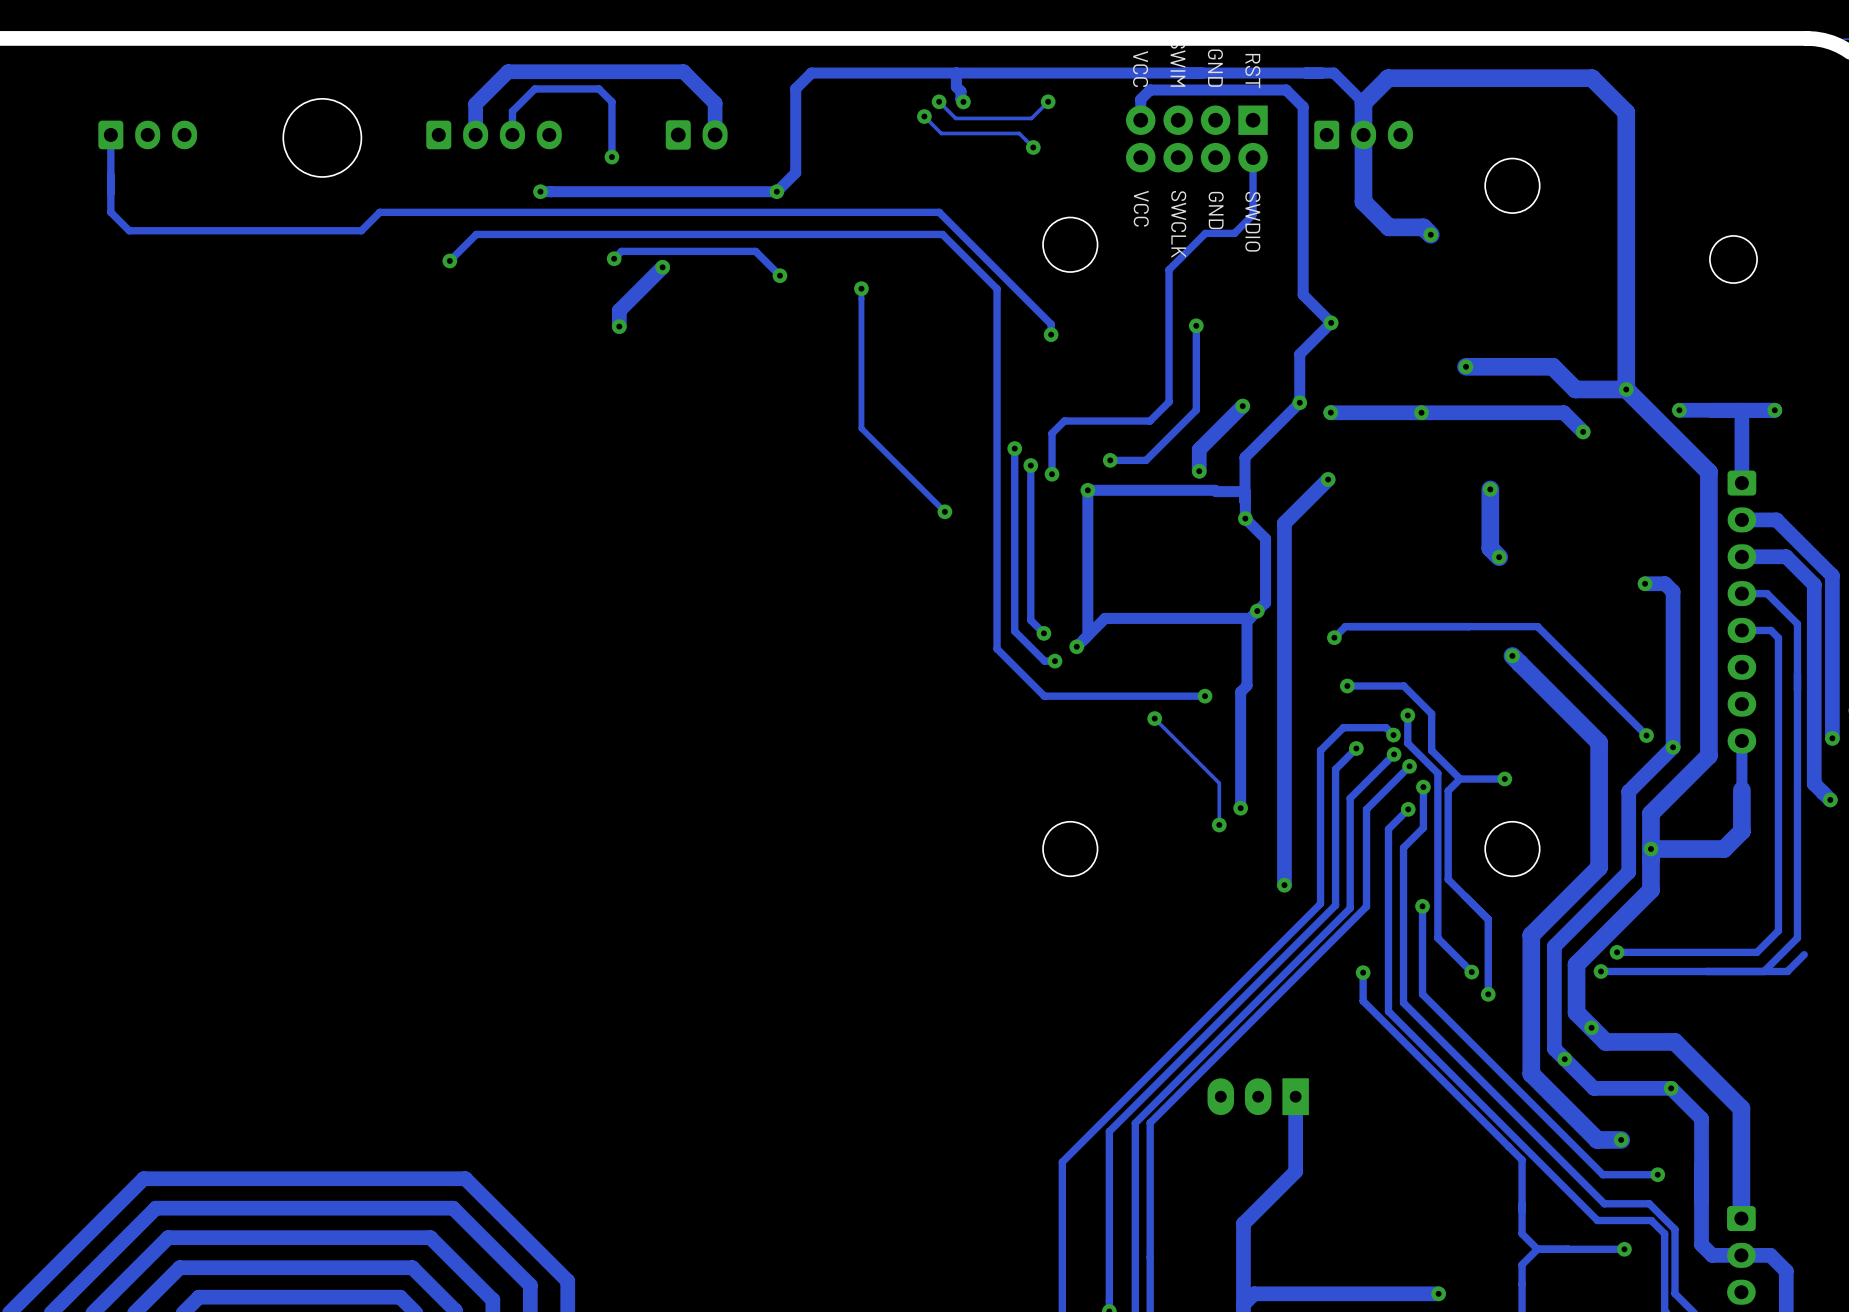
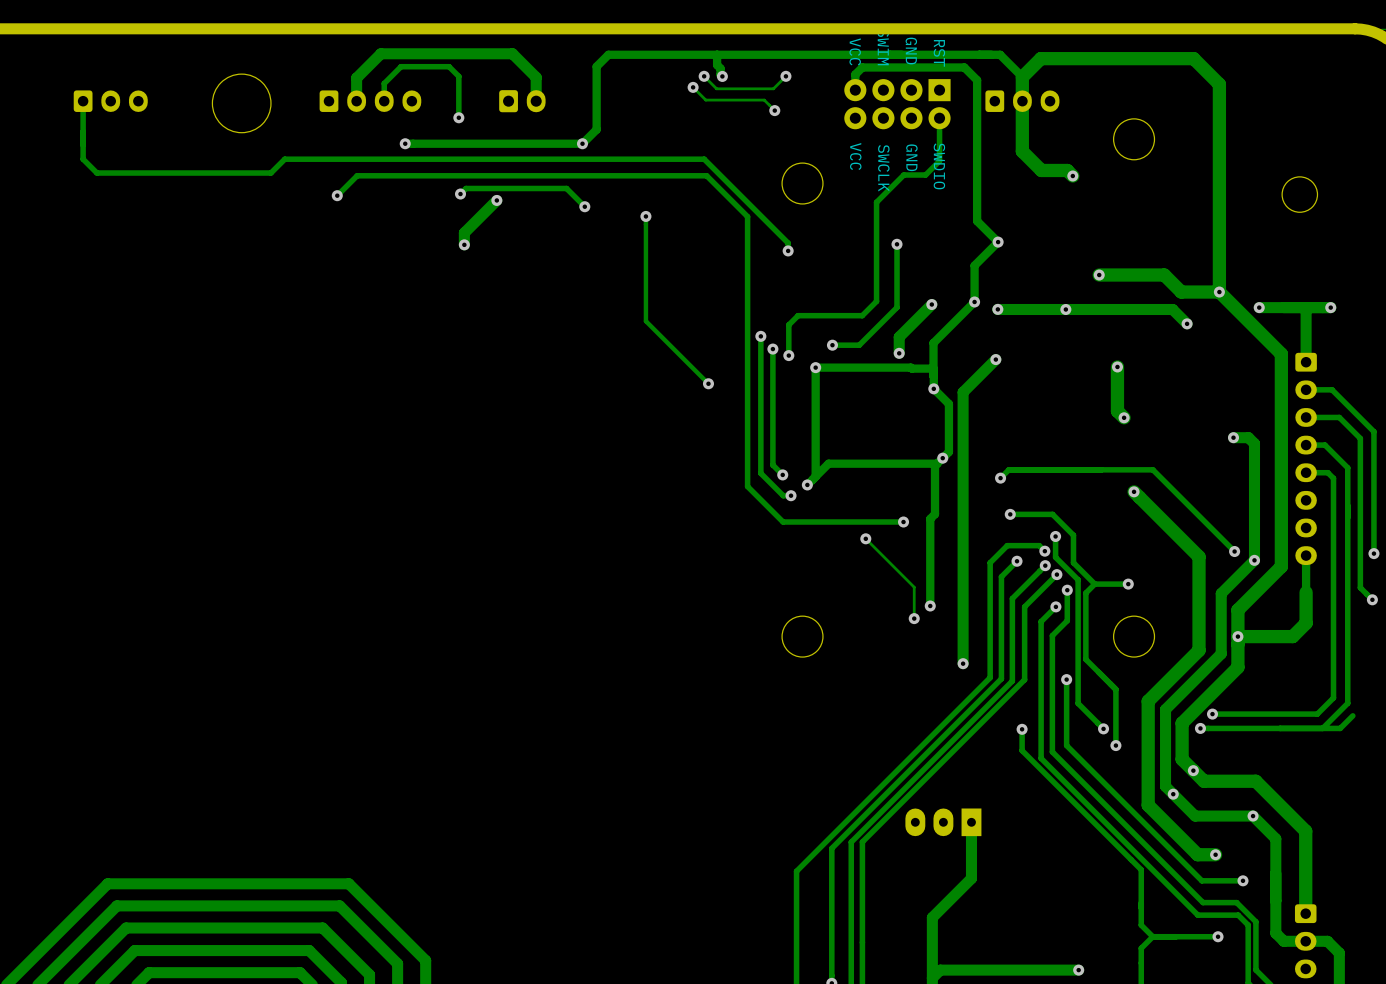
track width: thick (1741, 519) (1776, 519) (1832, 575) (1832, 738) -> thin (1306, 389) (1332, 389) (1373, 431) (1373, 553)
track width: thick (1741, 556) (1786, 556) (1814, 584) (1814, 783) (1830, 799) -> thin (1306, 417) (1339, 417) (1360, 438) (1360, 587) (1372, 599)

